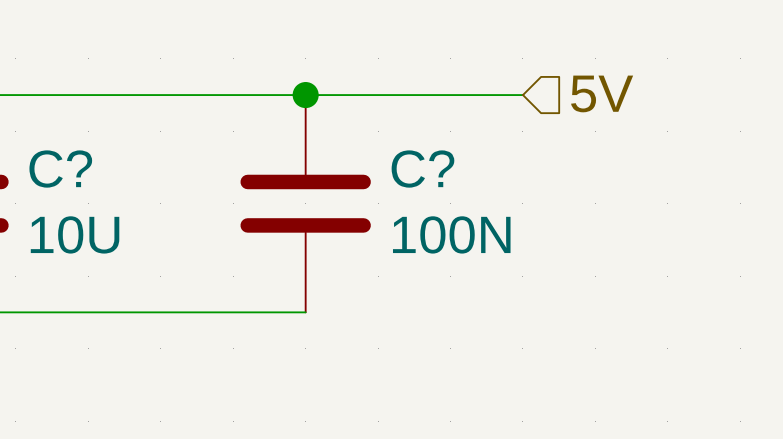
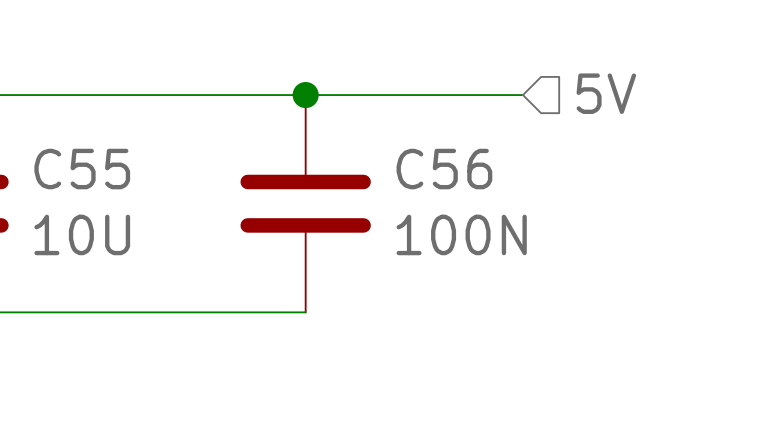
C? name: C? (60, 169) -> C55 (82, 169)
C? name: C? (422, 169) -> C56 (444, 169)

